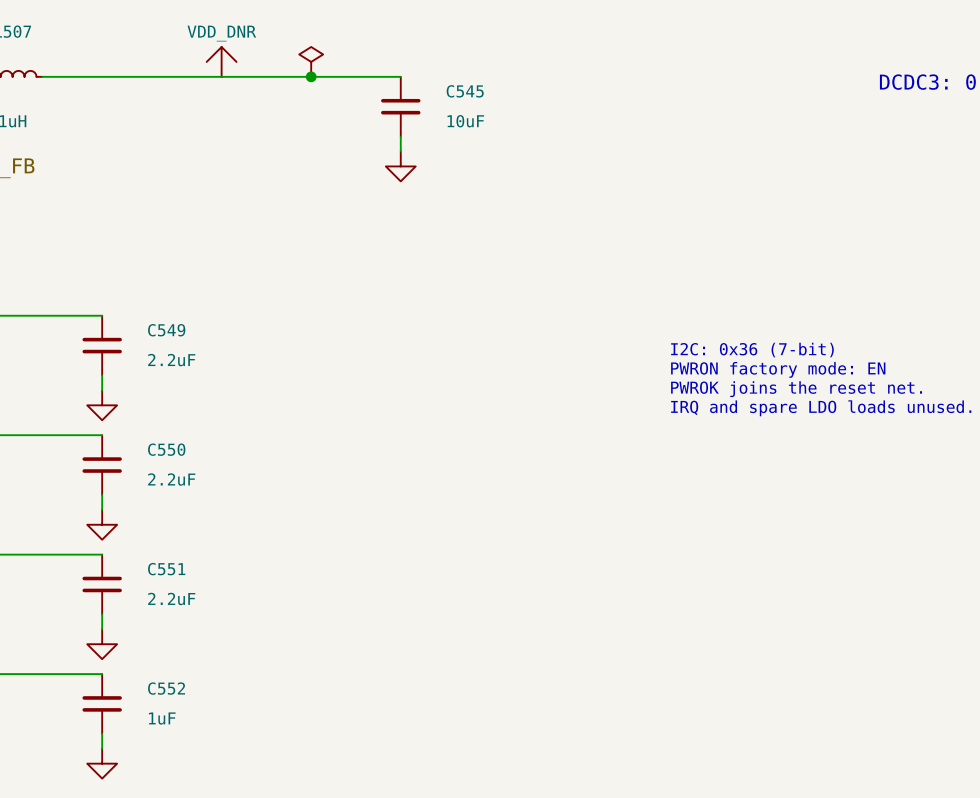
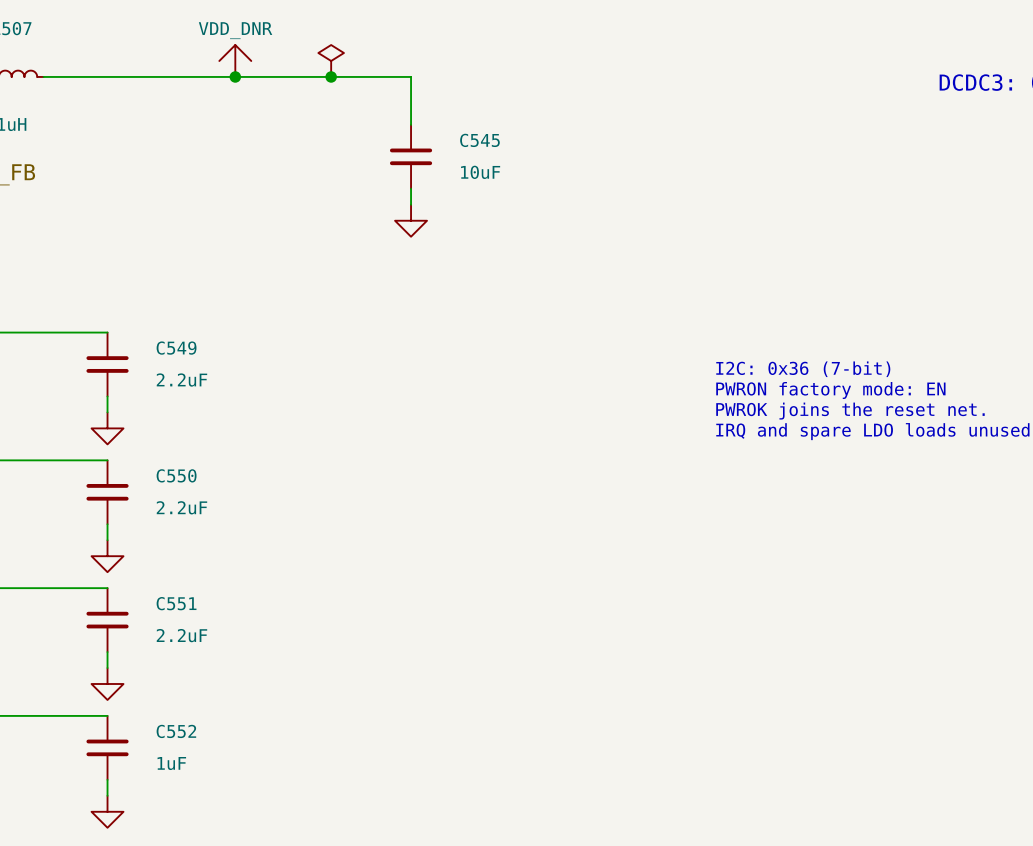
junction: none -> (235, 76)
wire: (385, 76) (400, 76) -> (411, 76) (411, 124)
C545 position: (400, 106) -> (411, 156)
wire: (400, 136) (400, 151) -> (411, 188) (411, 204)
power symbol position: (400, 166) -> (411, 220)

